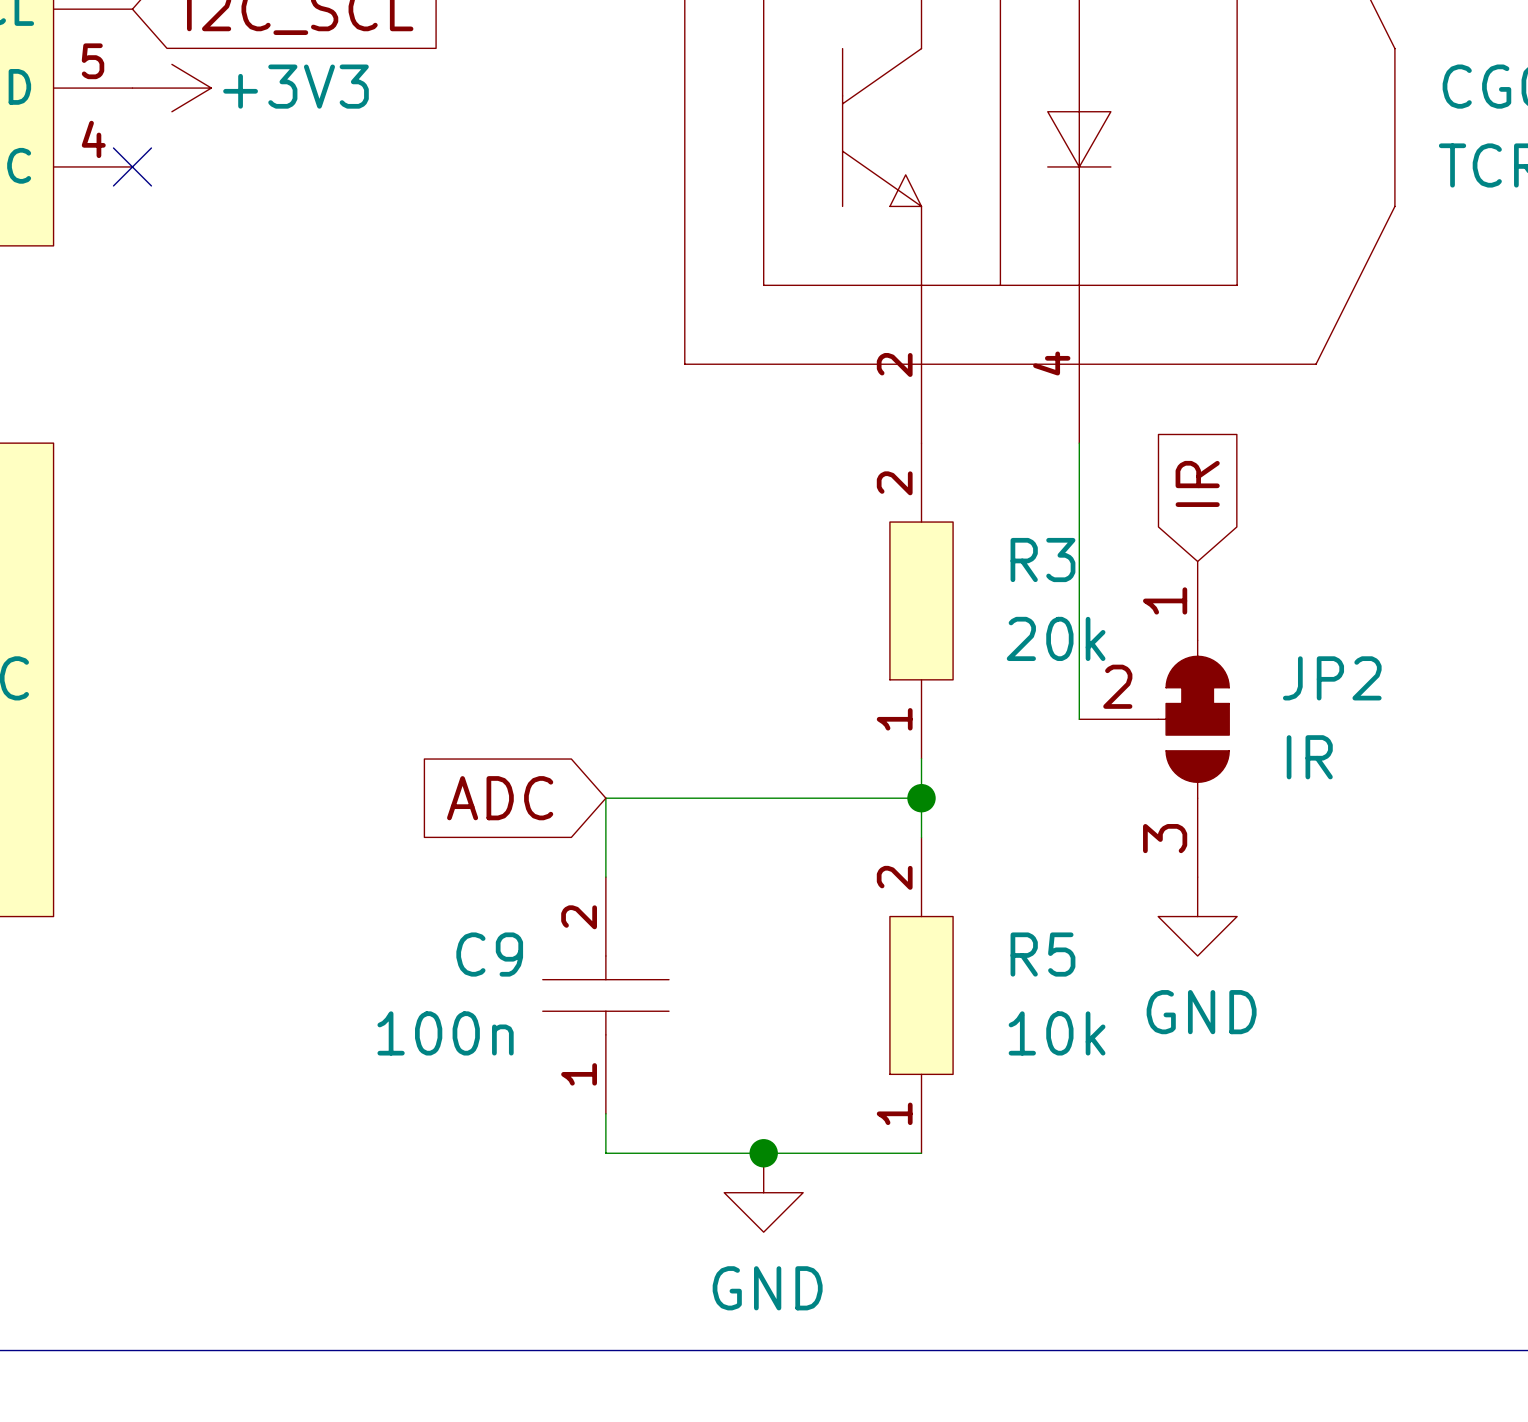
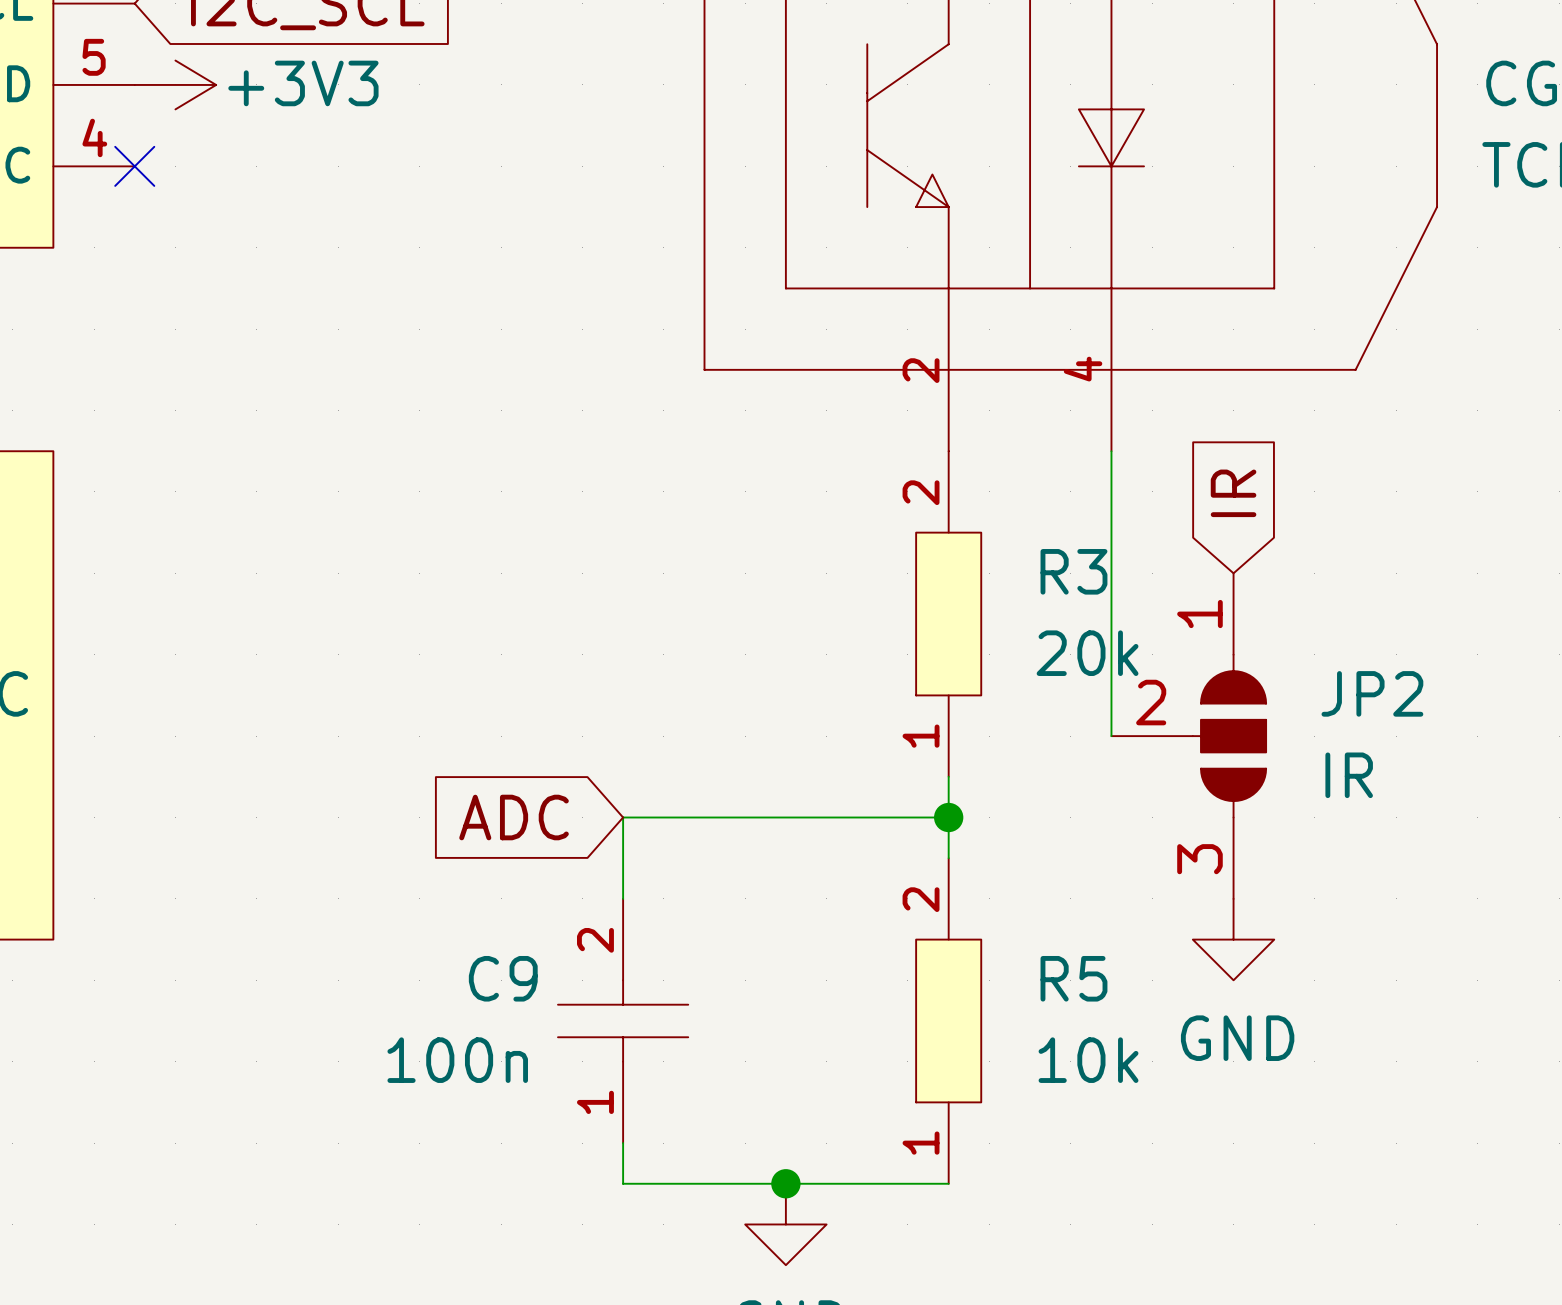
JP2 symbol: [1079, 561, 1230, 878] -> [1111, 573, 1267, 899]

